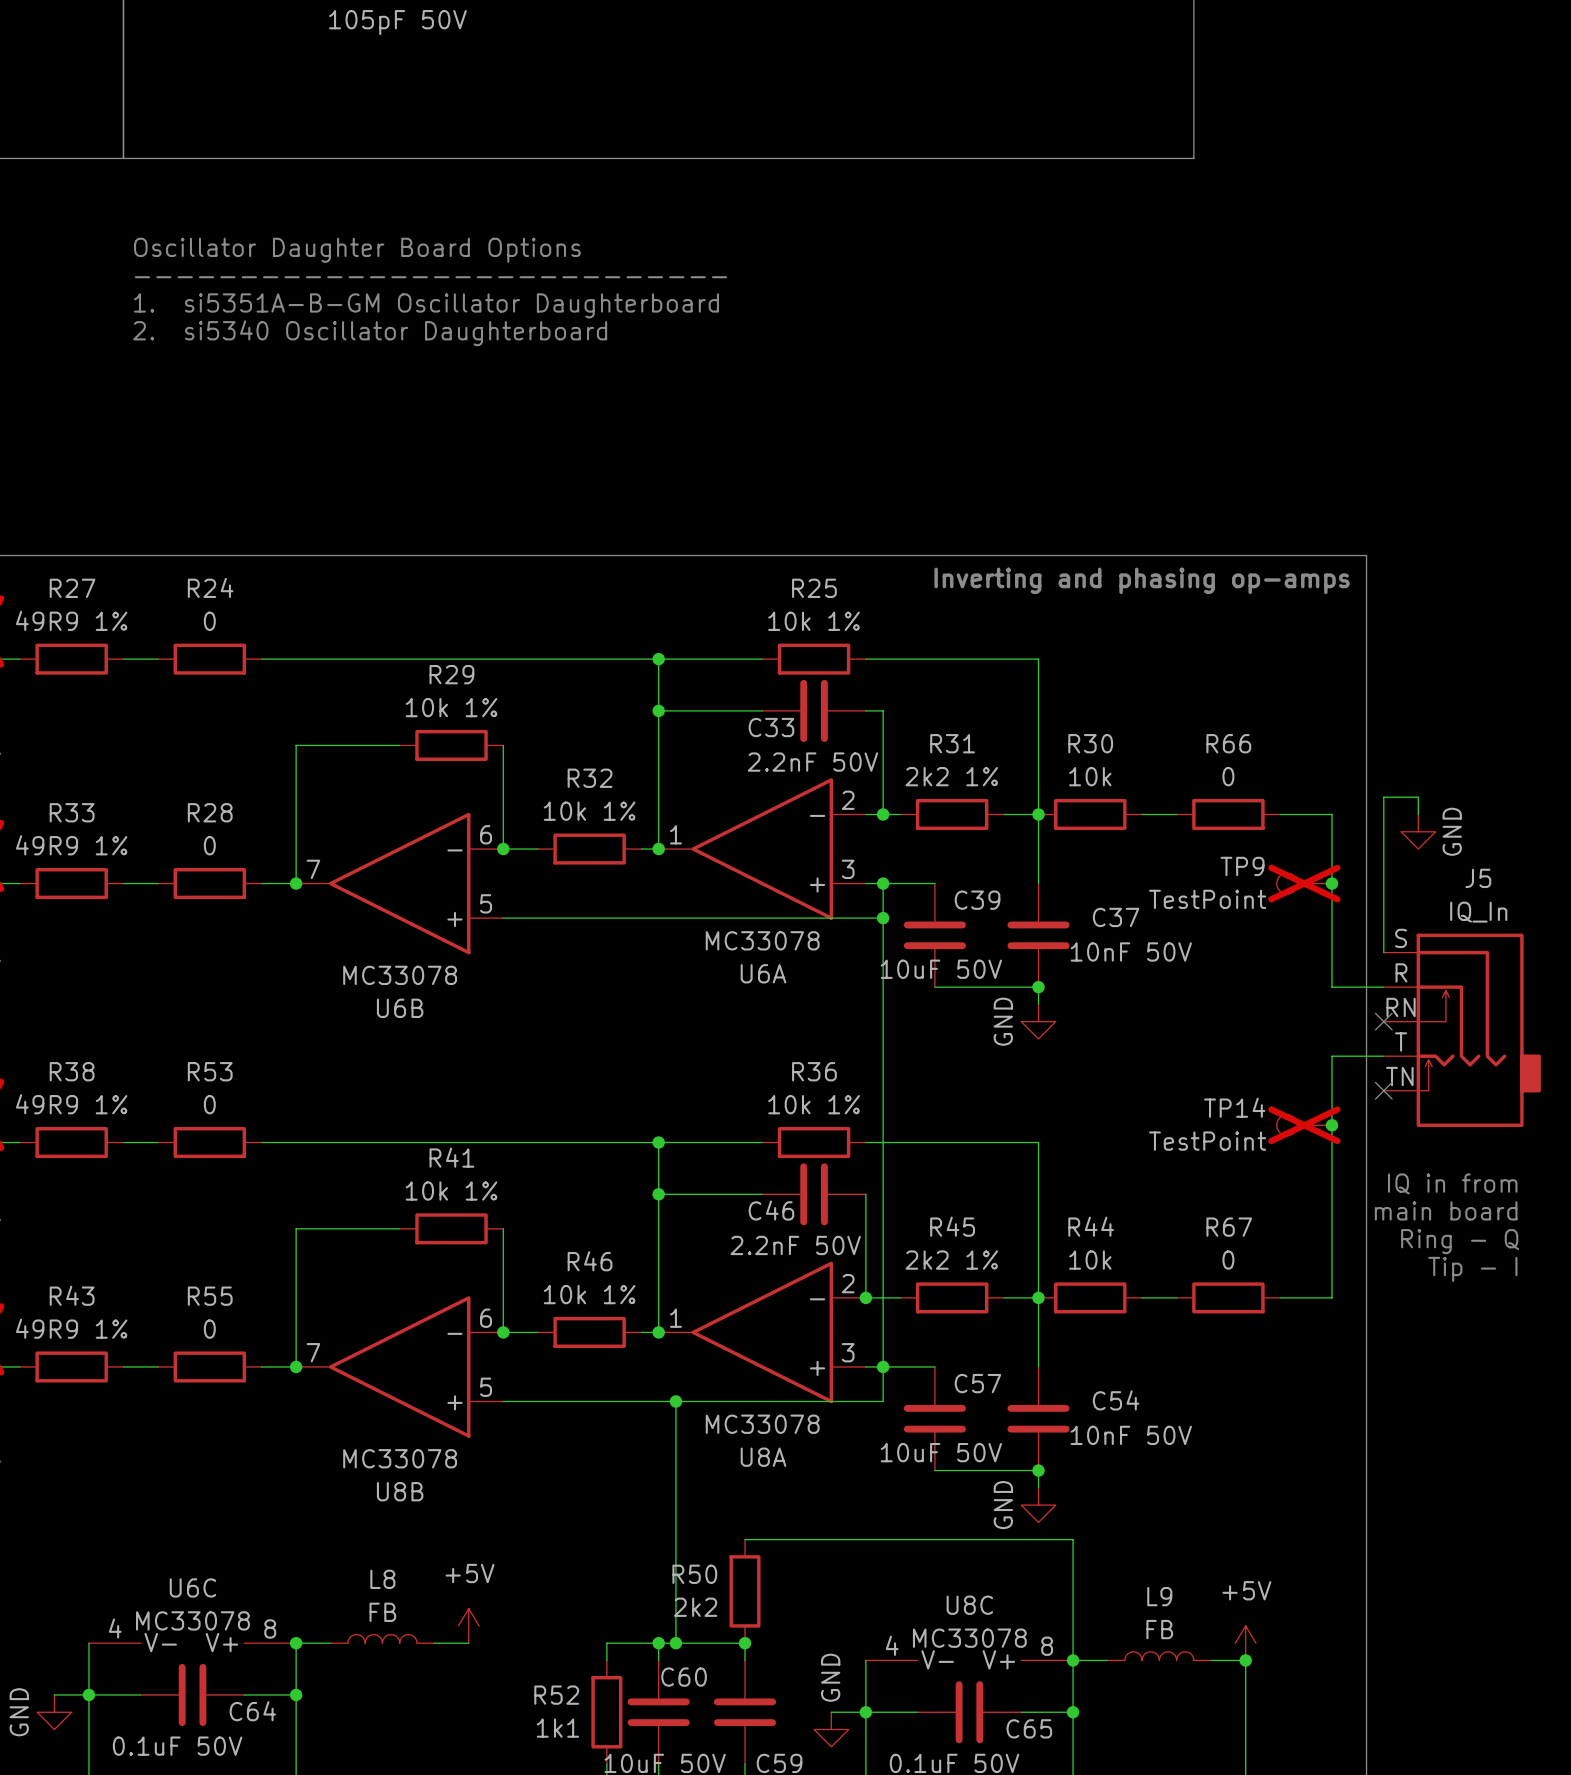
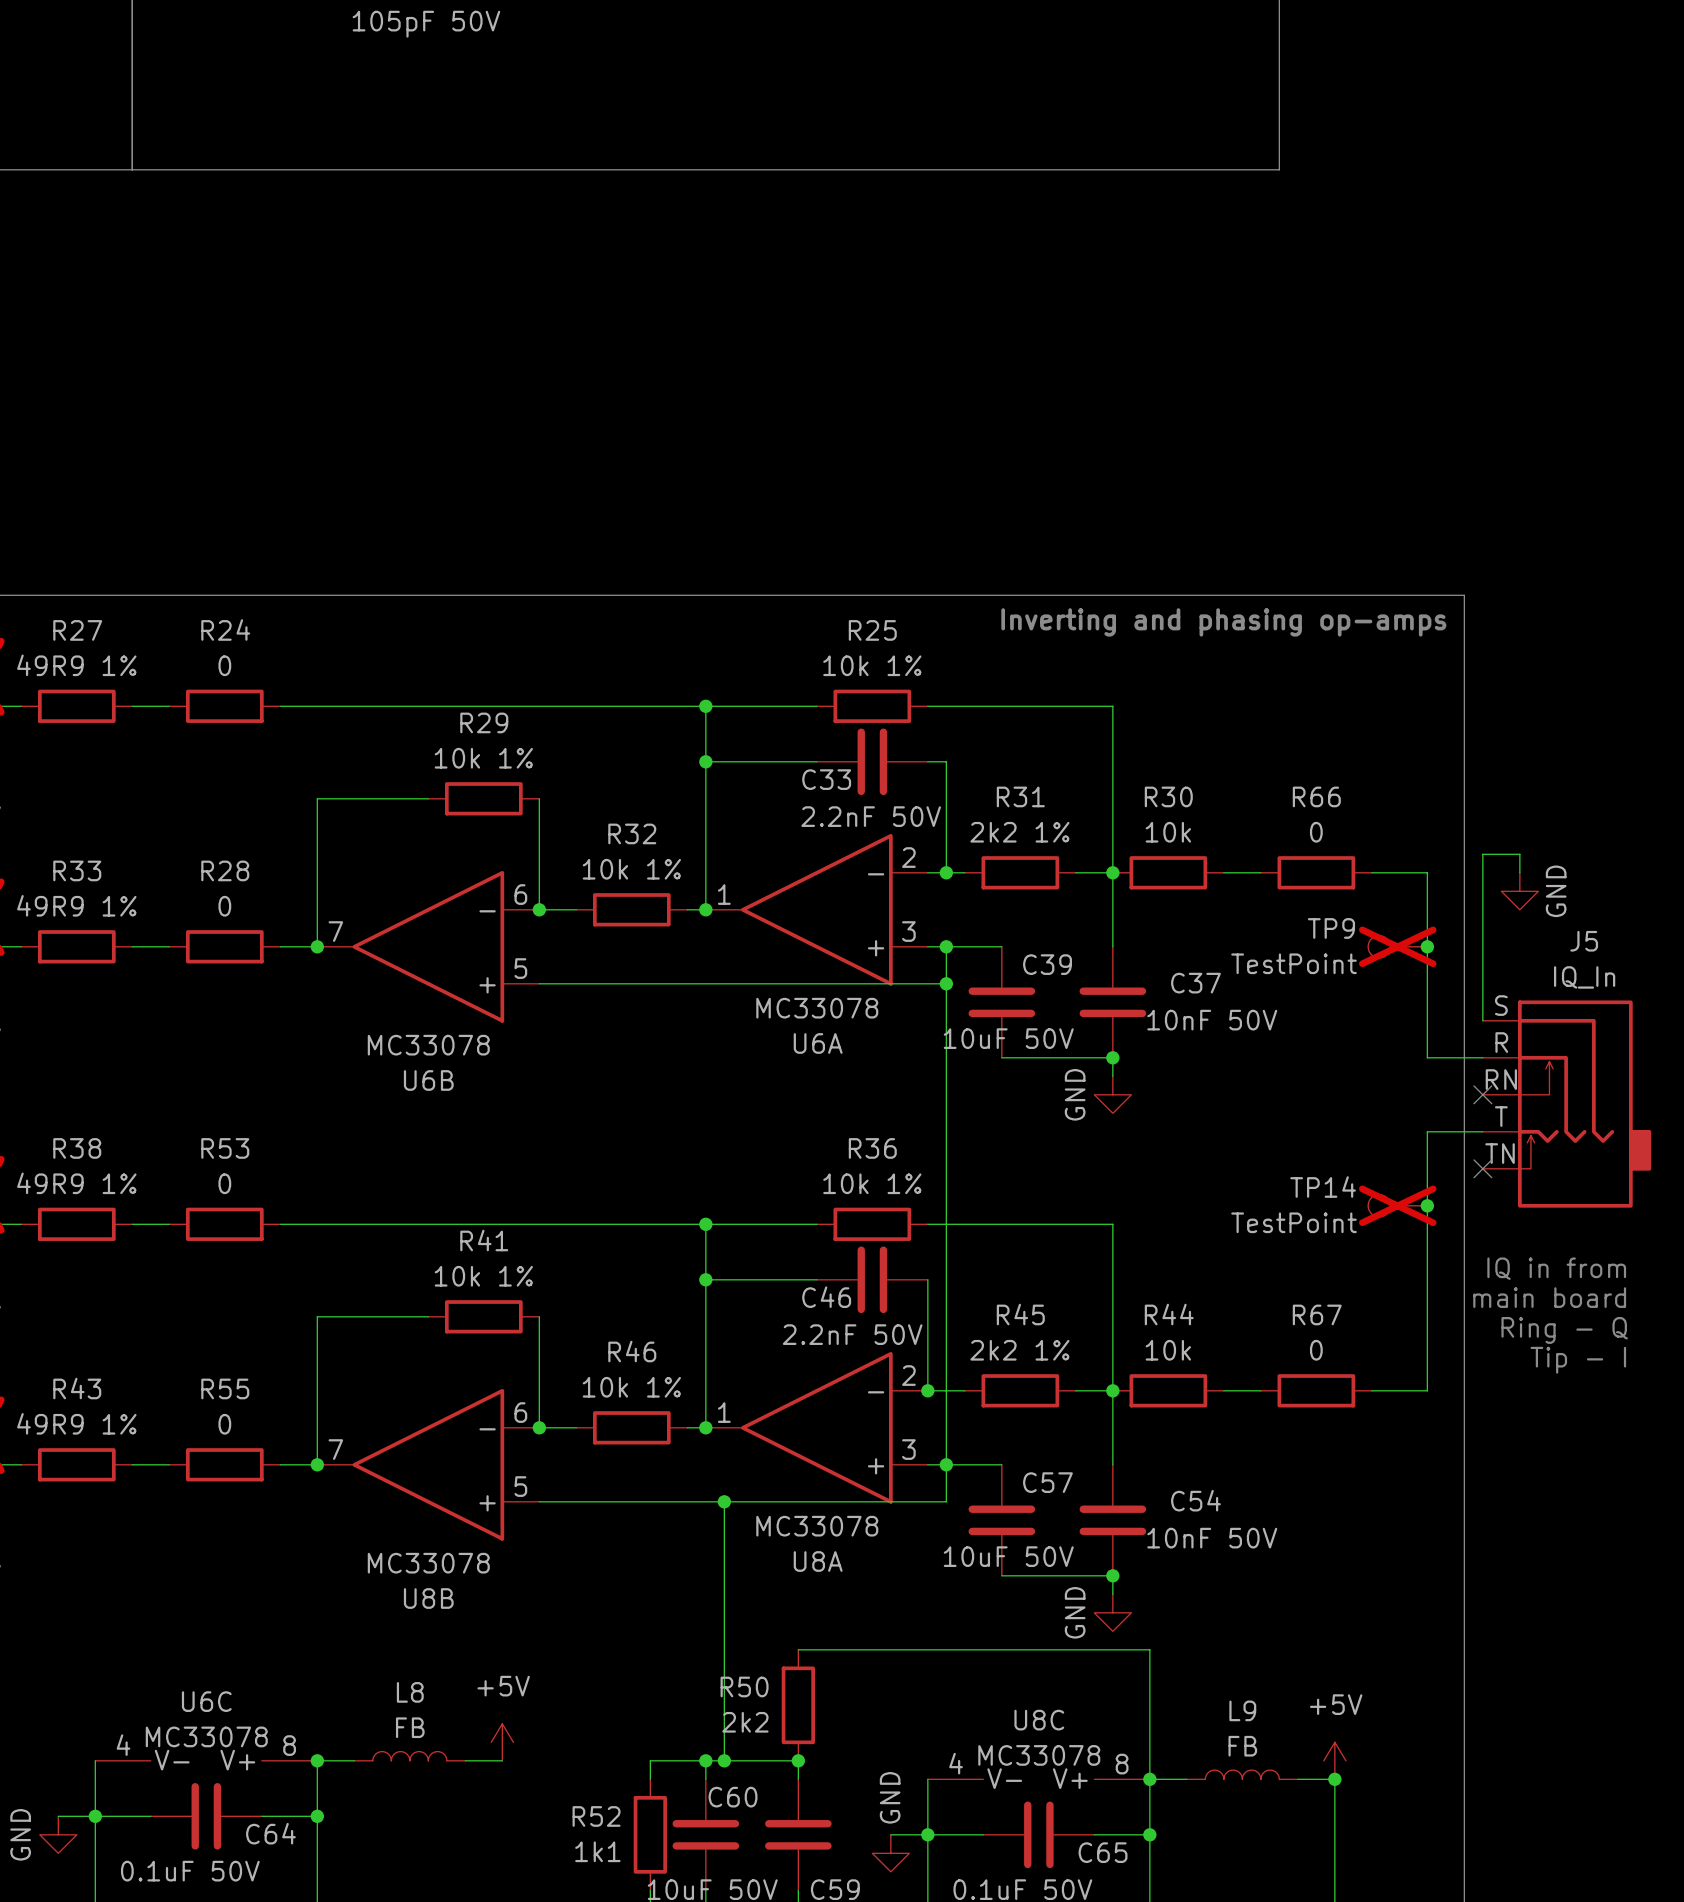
text: Oscillator Daughter Board Options (357, 250) -> none
text: ---------------------------- (431, 277) -> none
text: 1. si5351A-B-GM Oscillator Daughterboard (426, 305) -> none
text: 2. si5340 Oscillator Daughterboard (370, 333) -> none

